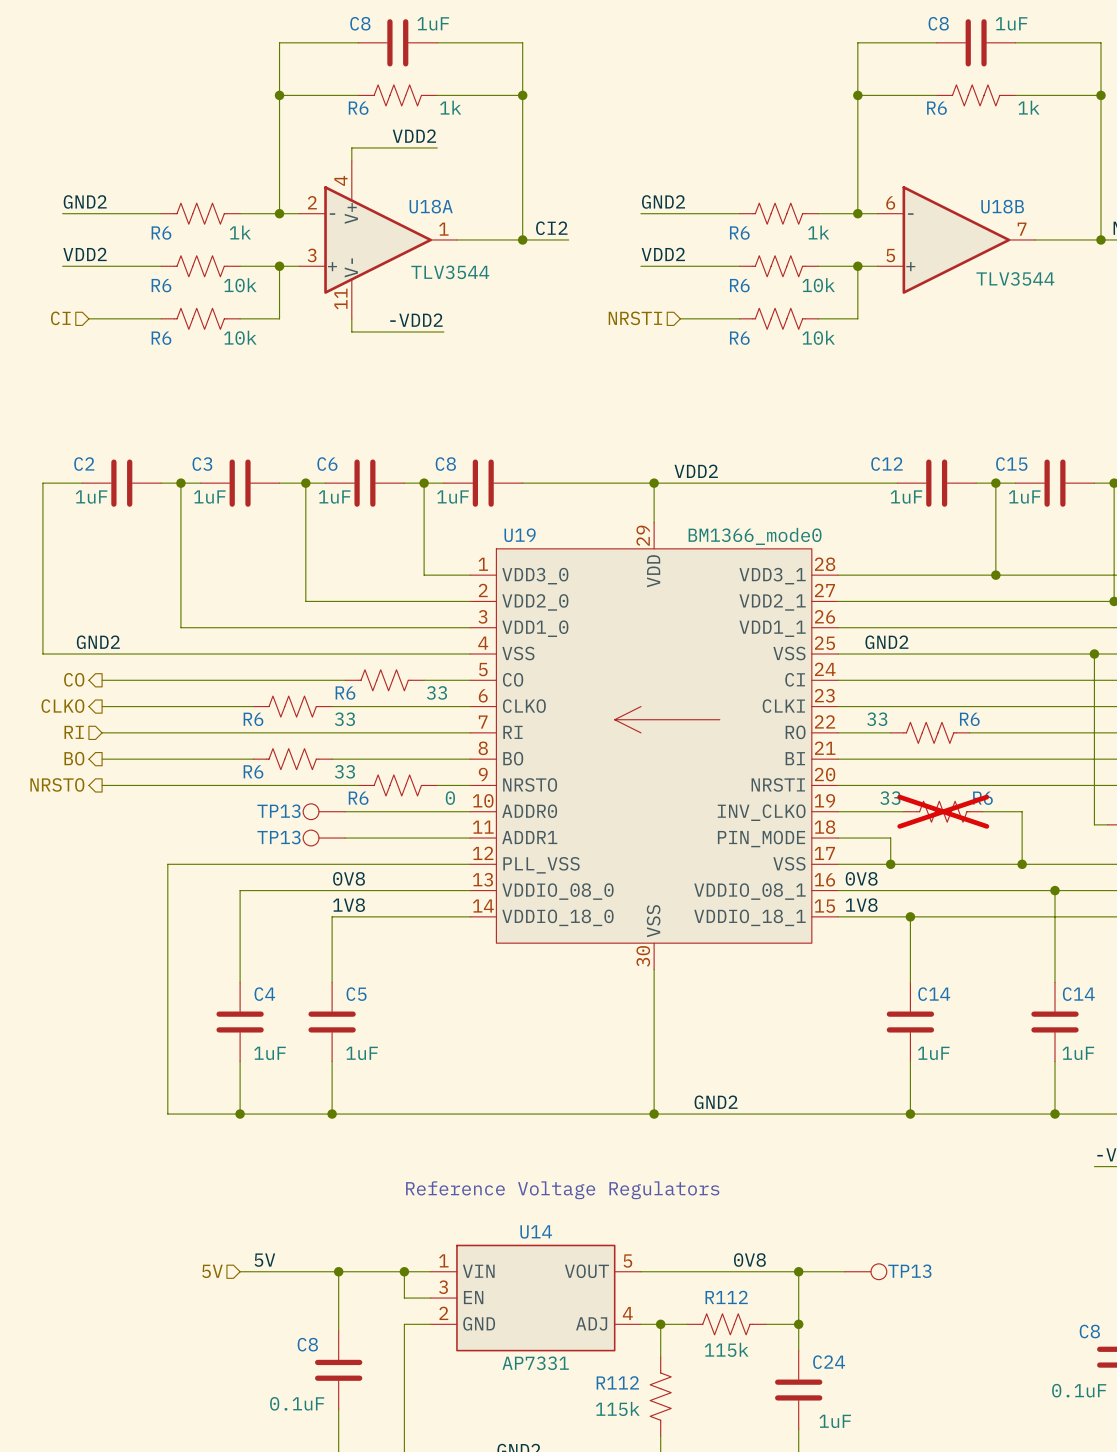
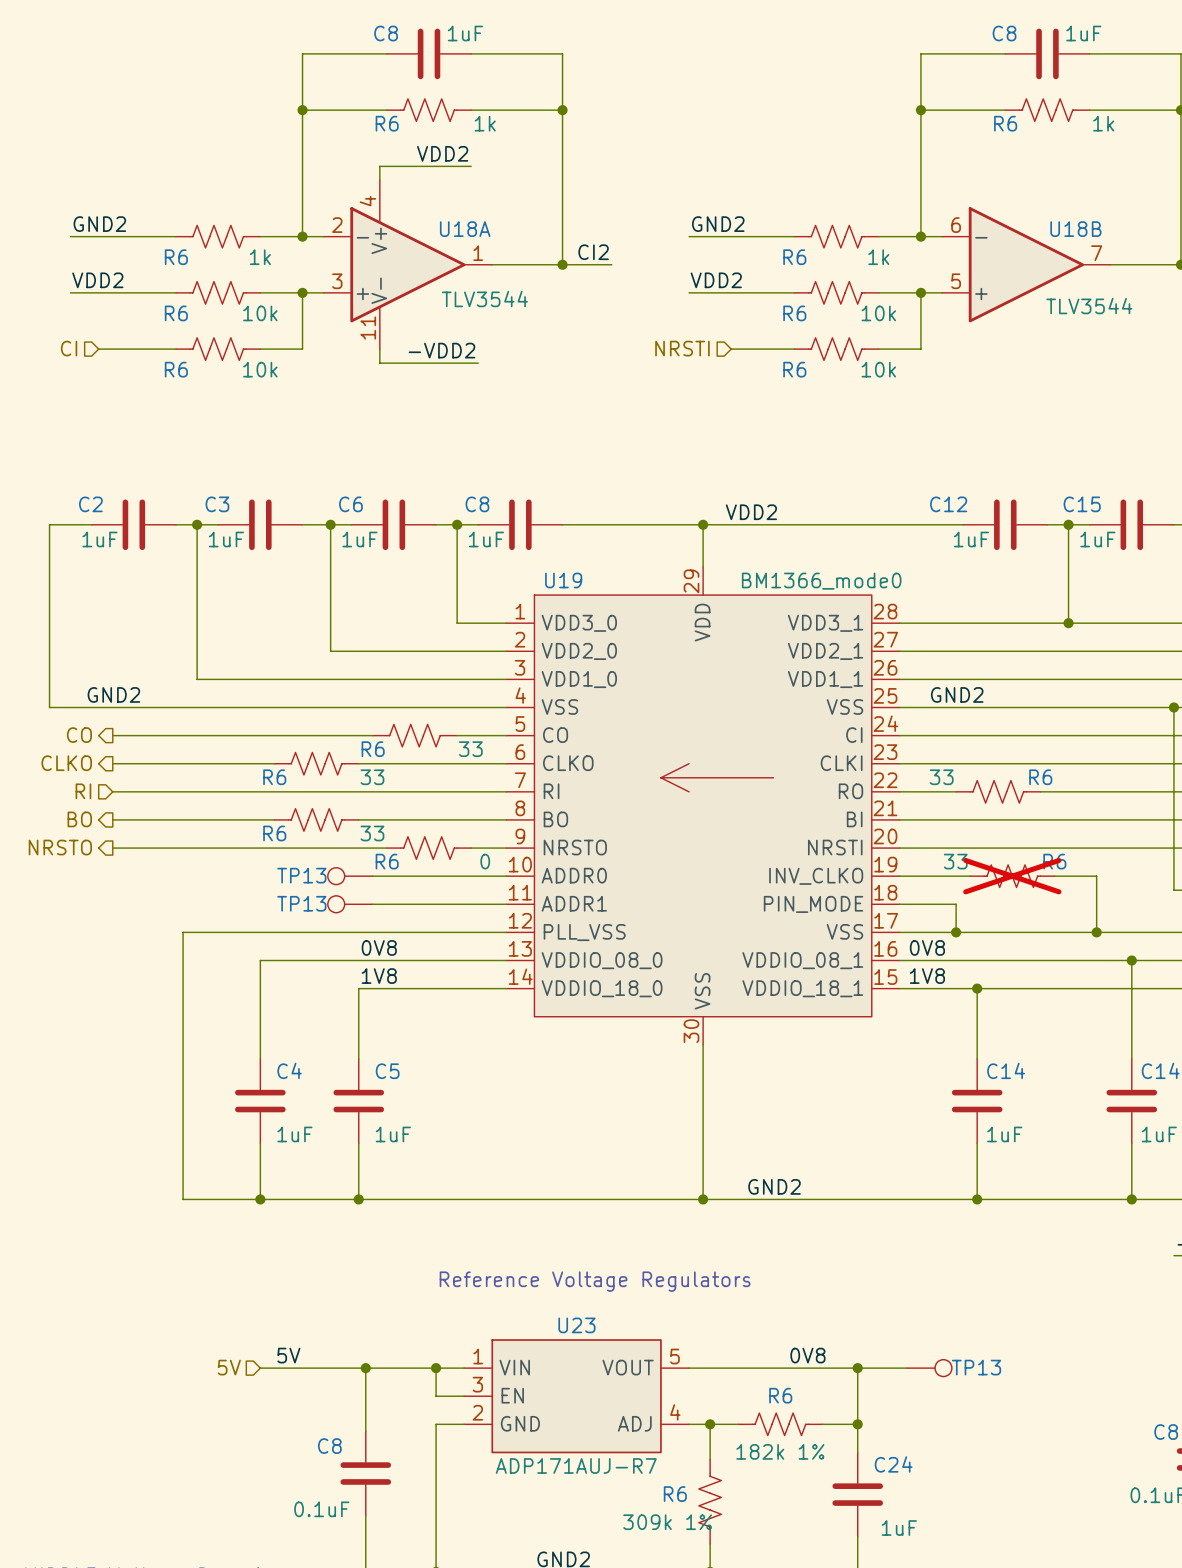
U14 name: U14 (536, 1231) -> U23 (576, 1325)
R112 name: R112 (726, 1297) -> R6 (780, 1395)
R112 value: 115k (726, 1349) -> 182k 1% (780, 1451)
U14 value: AP7331 (535, 1363) -> ADP171AUJ-R7 (576, 1465)
R112 name: R112 (617, 1382) -> R6 (675, 1494)
R112 value: 115k (617, 1408) -> 309k 1% (667, 1522)

